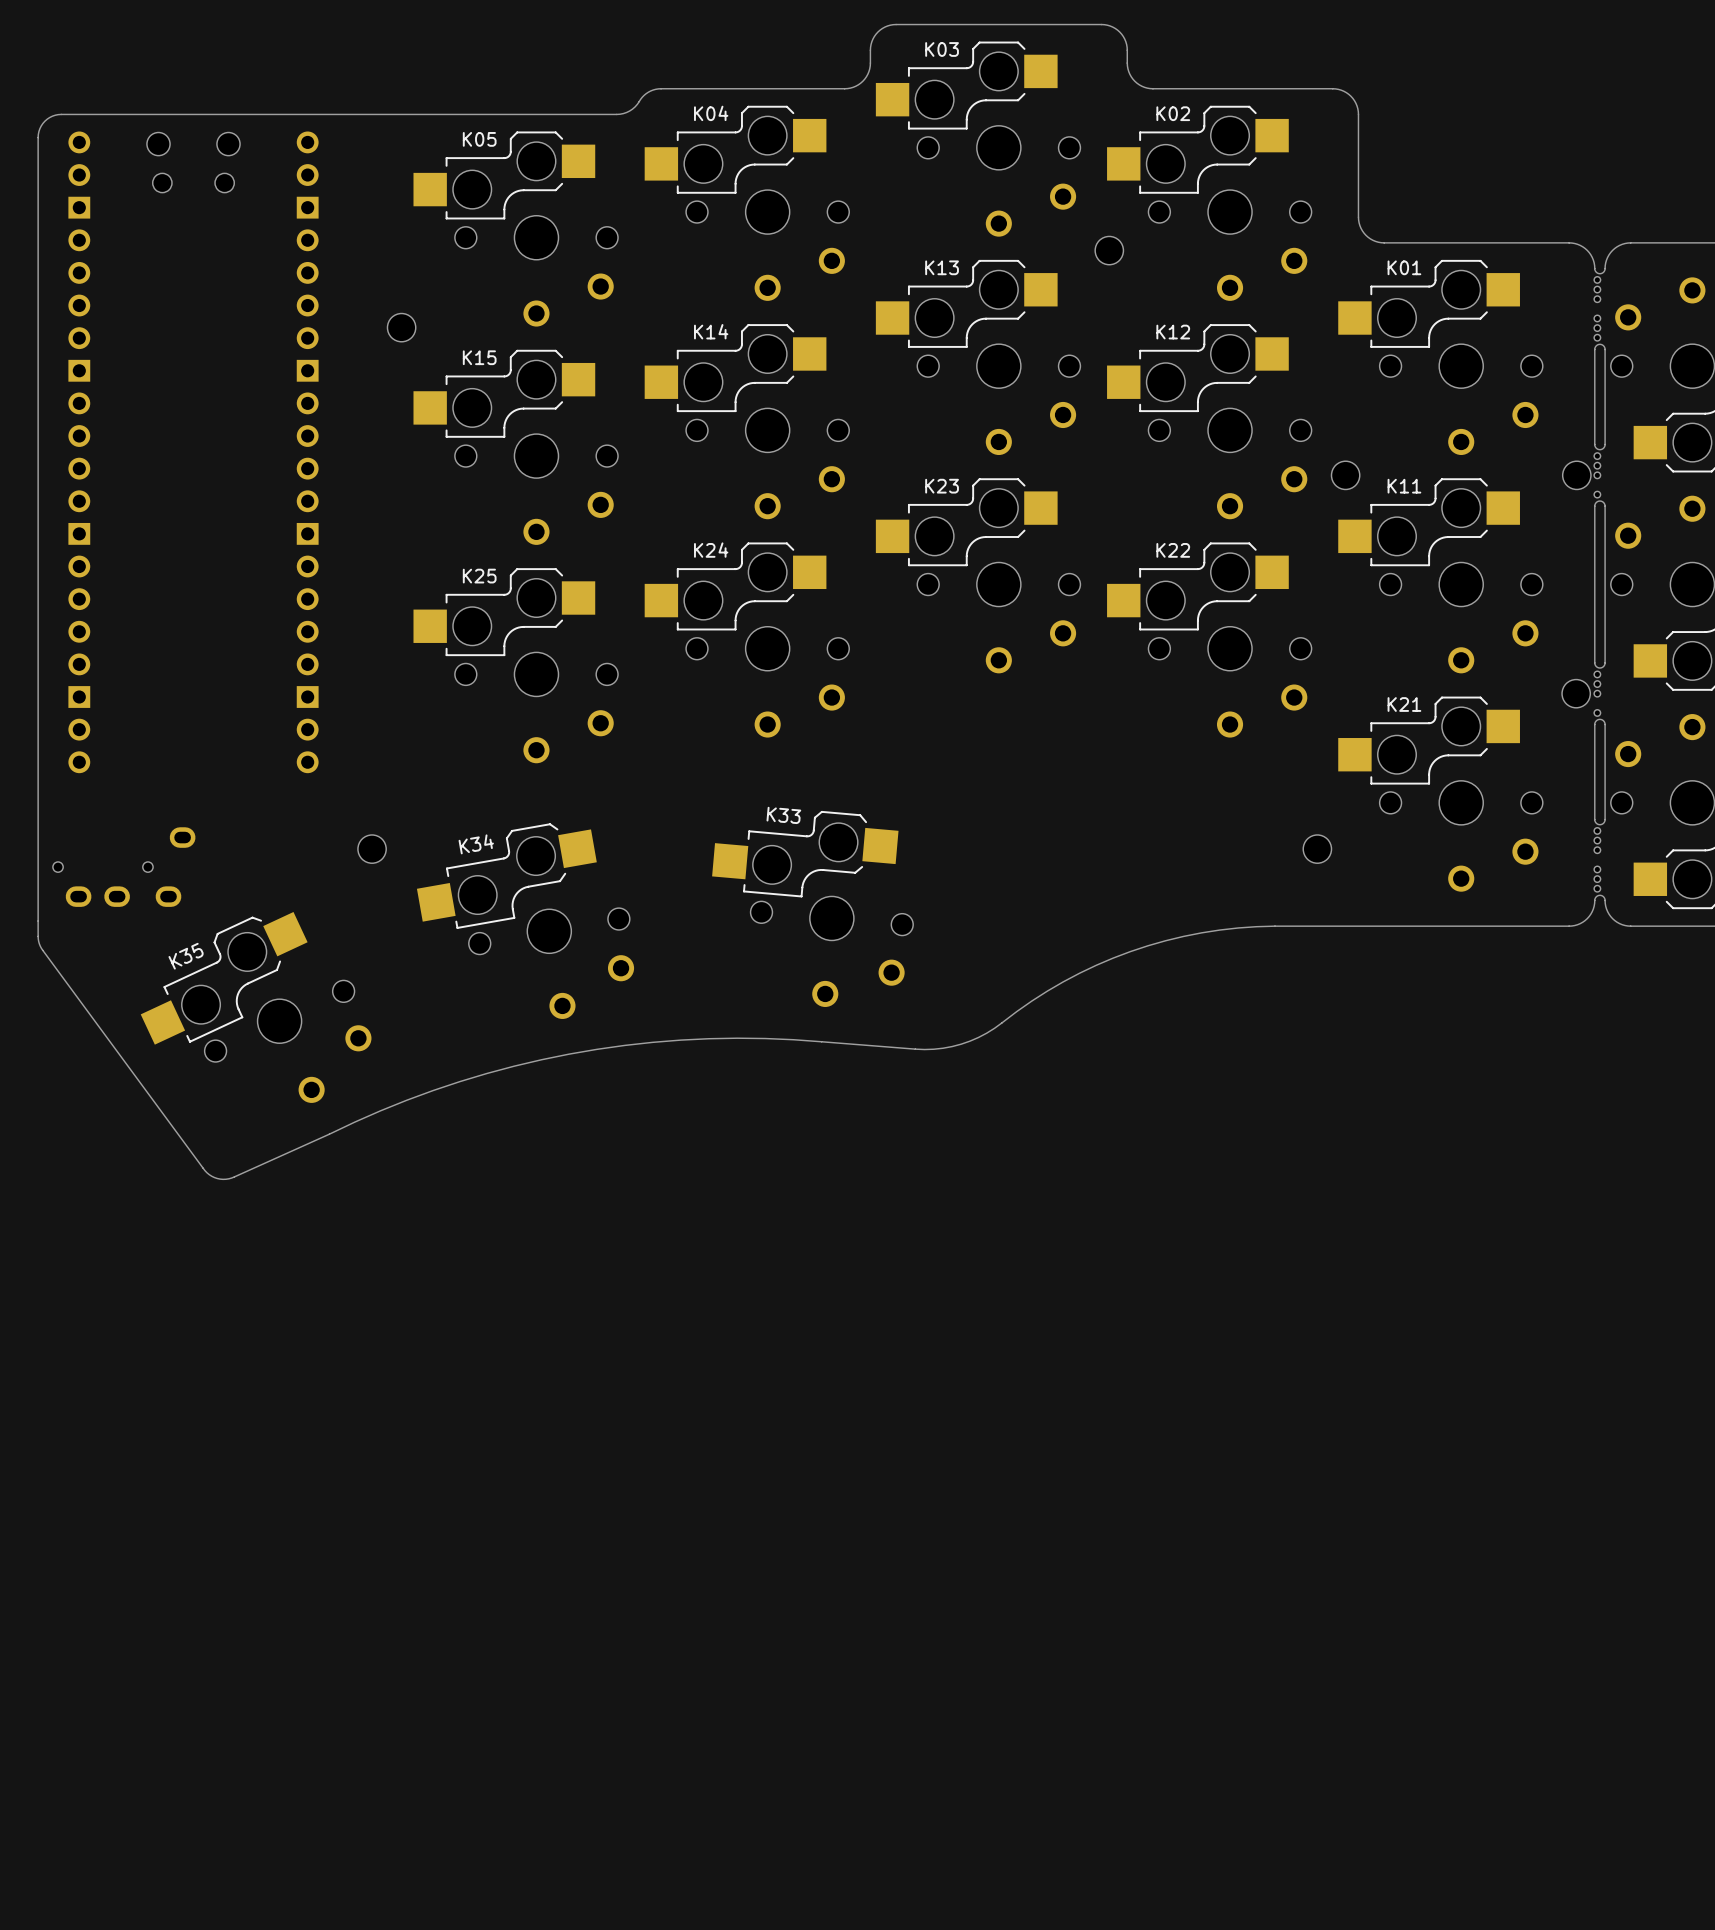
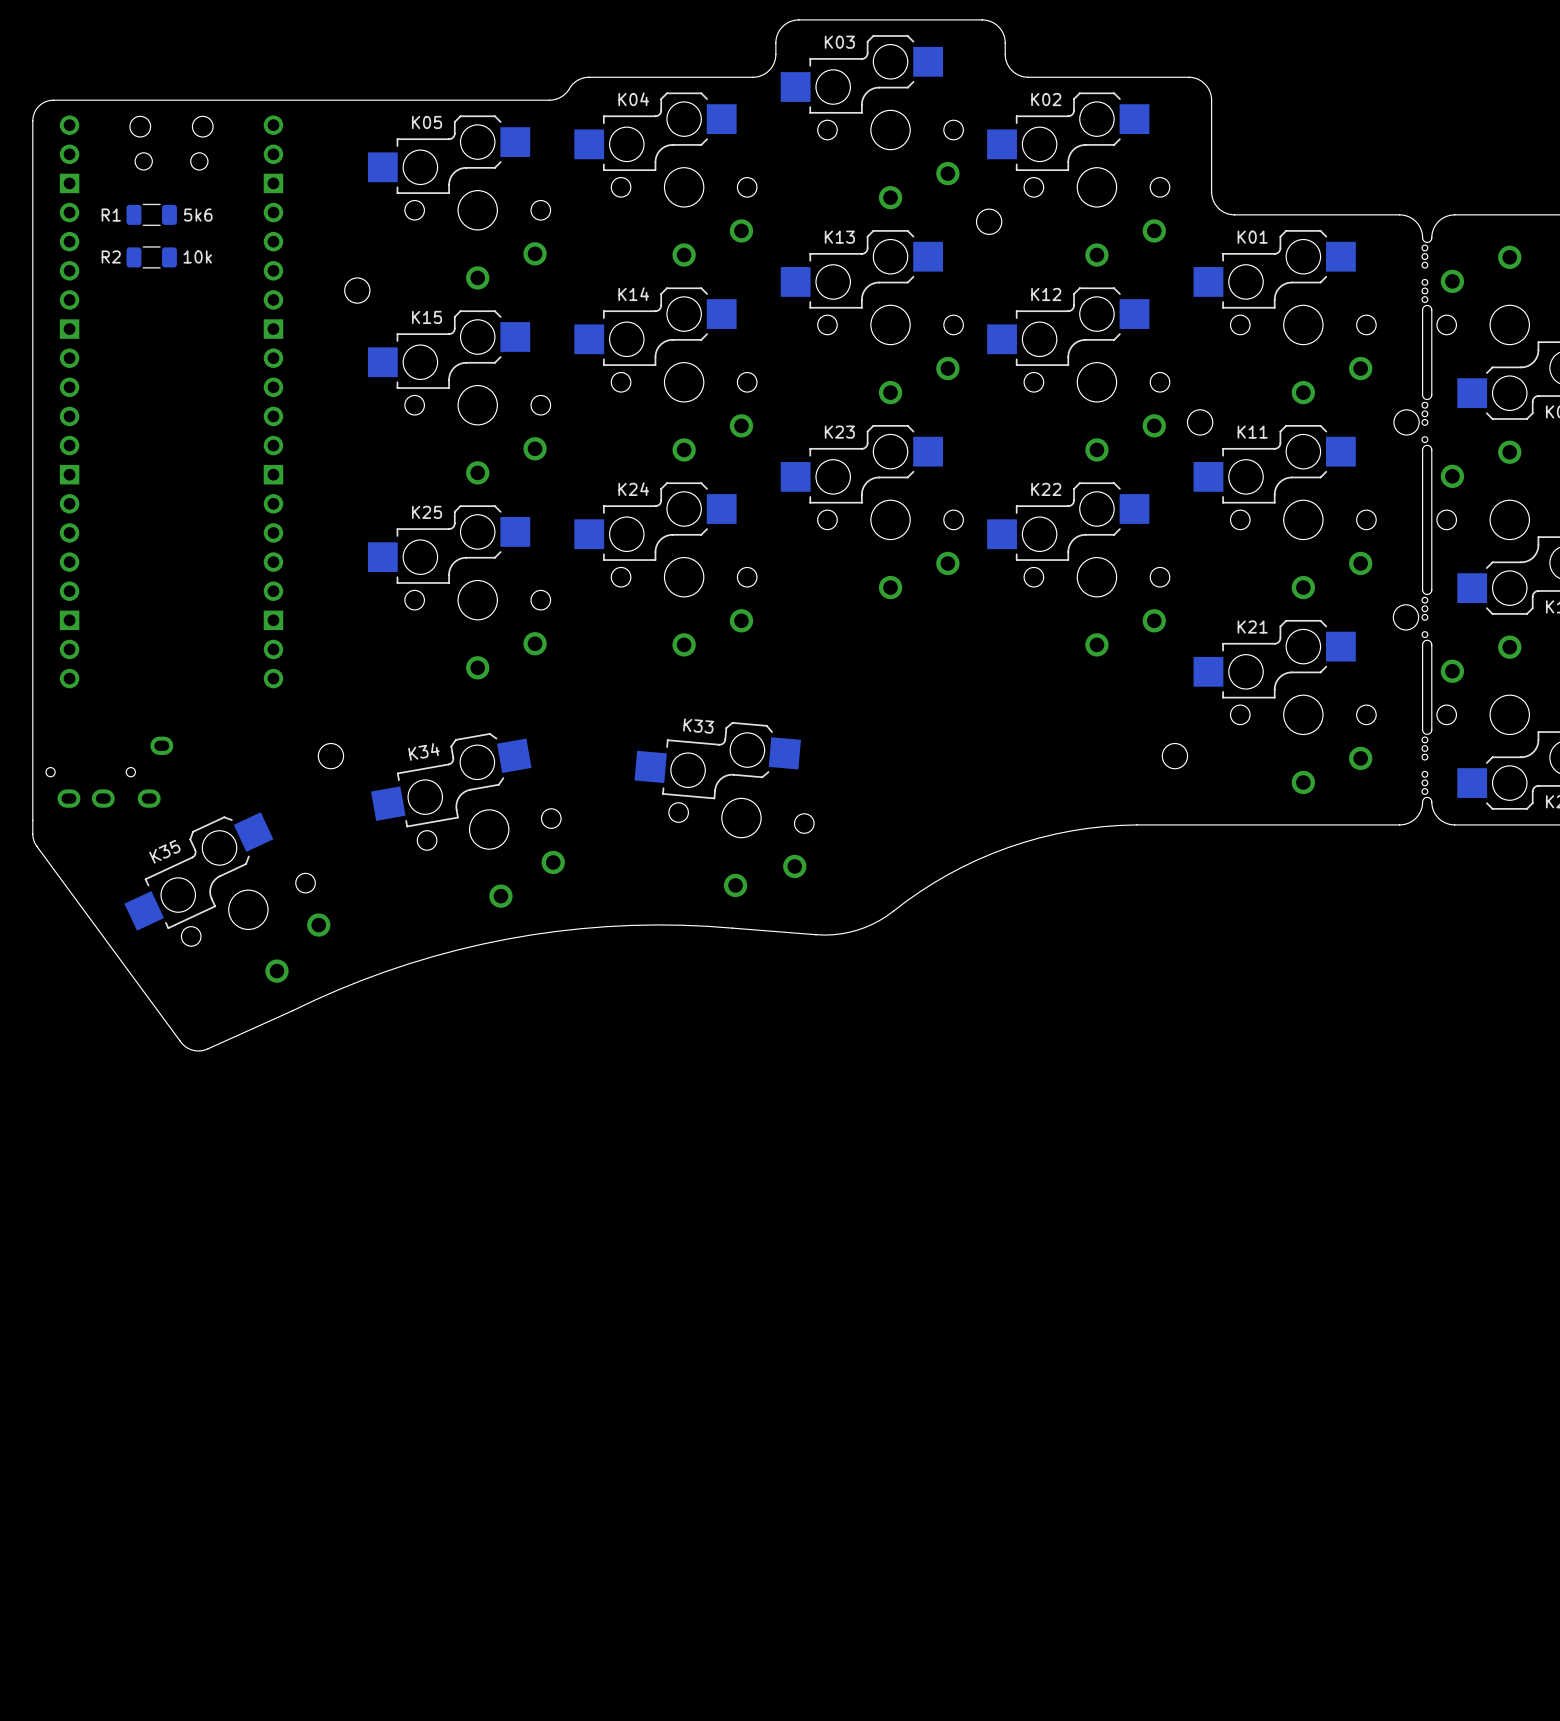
R1: none -> 5k6 (151, 214)
R2: none -> 10k (151, 257)

